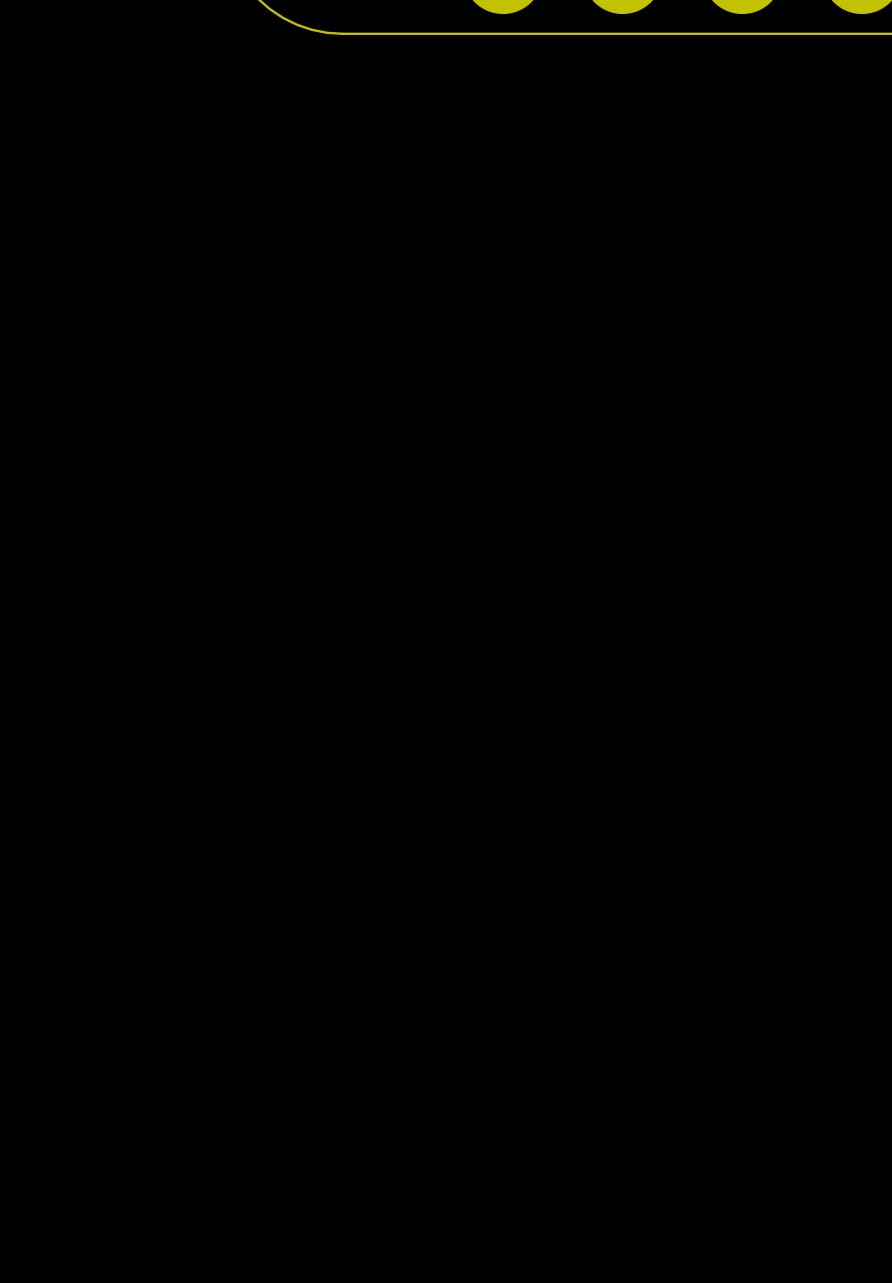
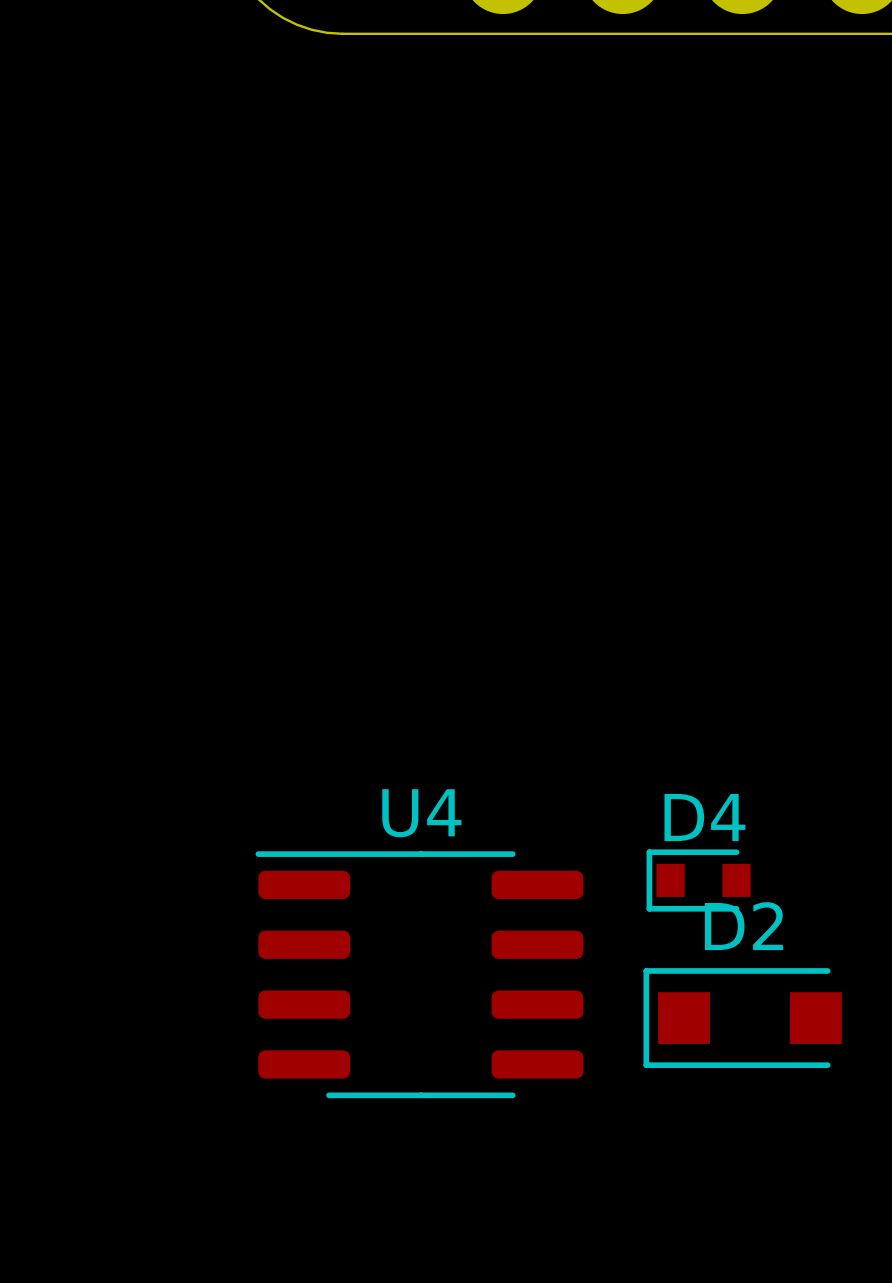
D4: none -> (698, 880)
U4: none -> (419, 974)
D2: none -> (742, 1018)

